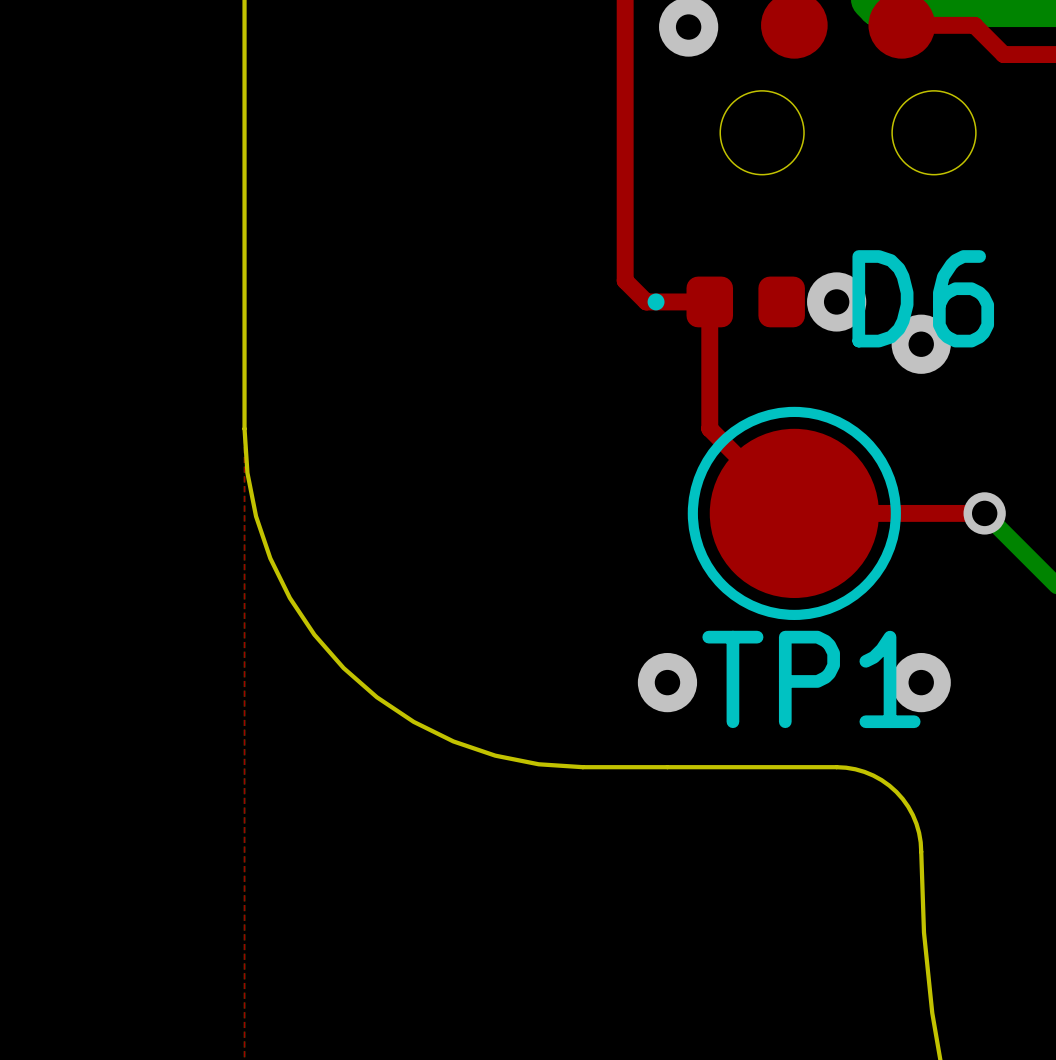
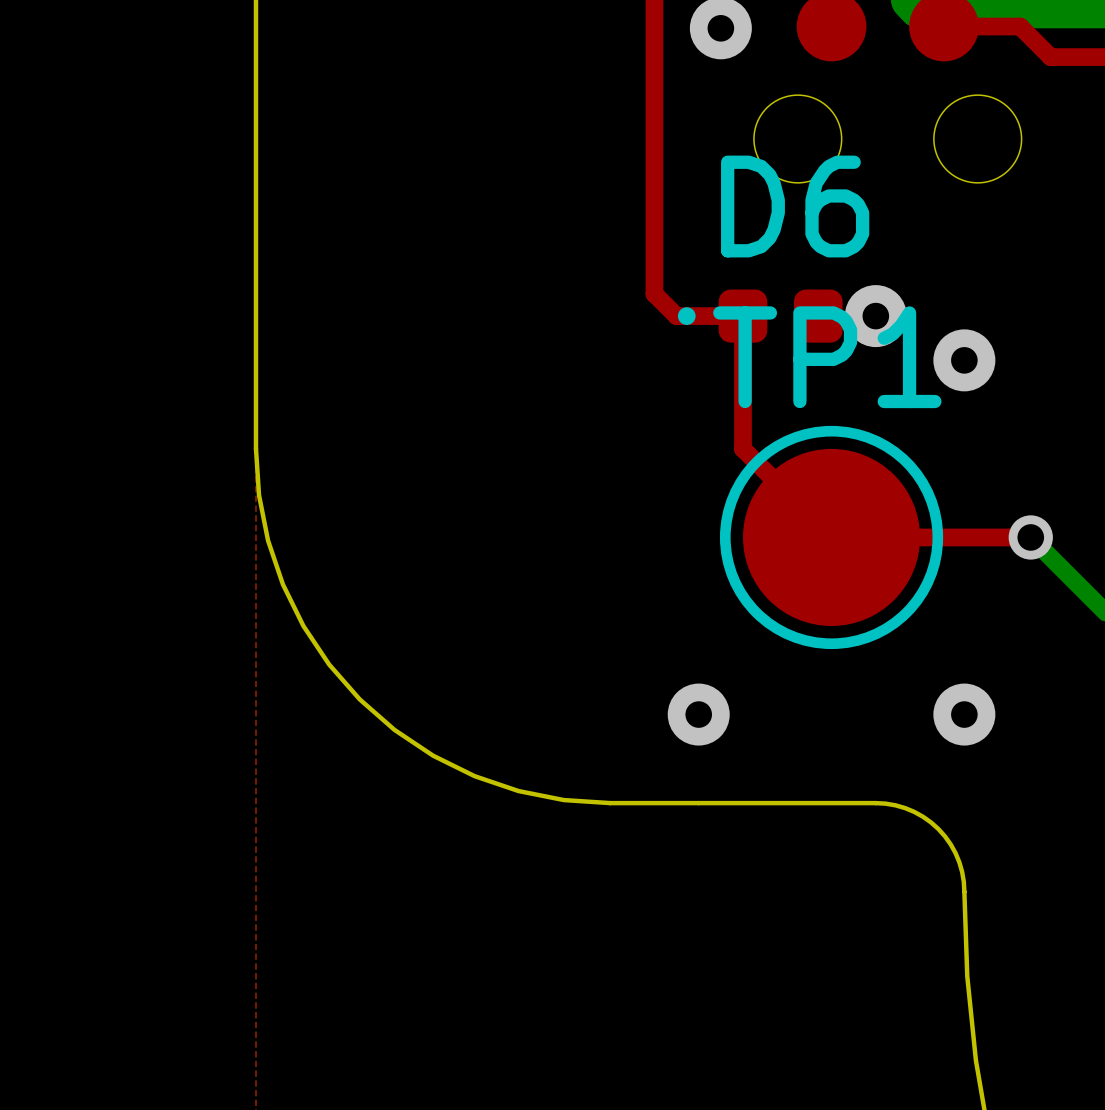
D6 name position: D6 (923, 298) -> D6 (795, 206)
TP1 name position: TP1 (811, 679) -> TP1 (827, 357)

